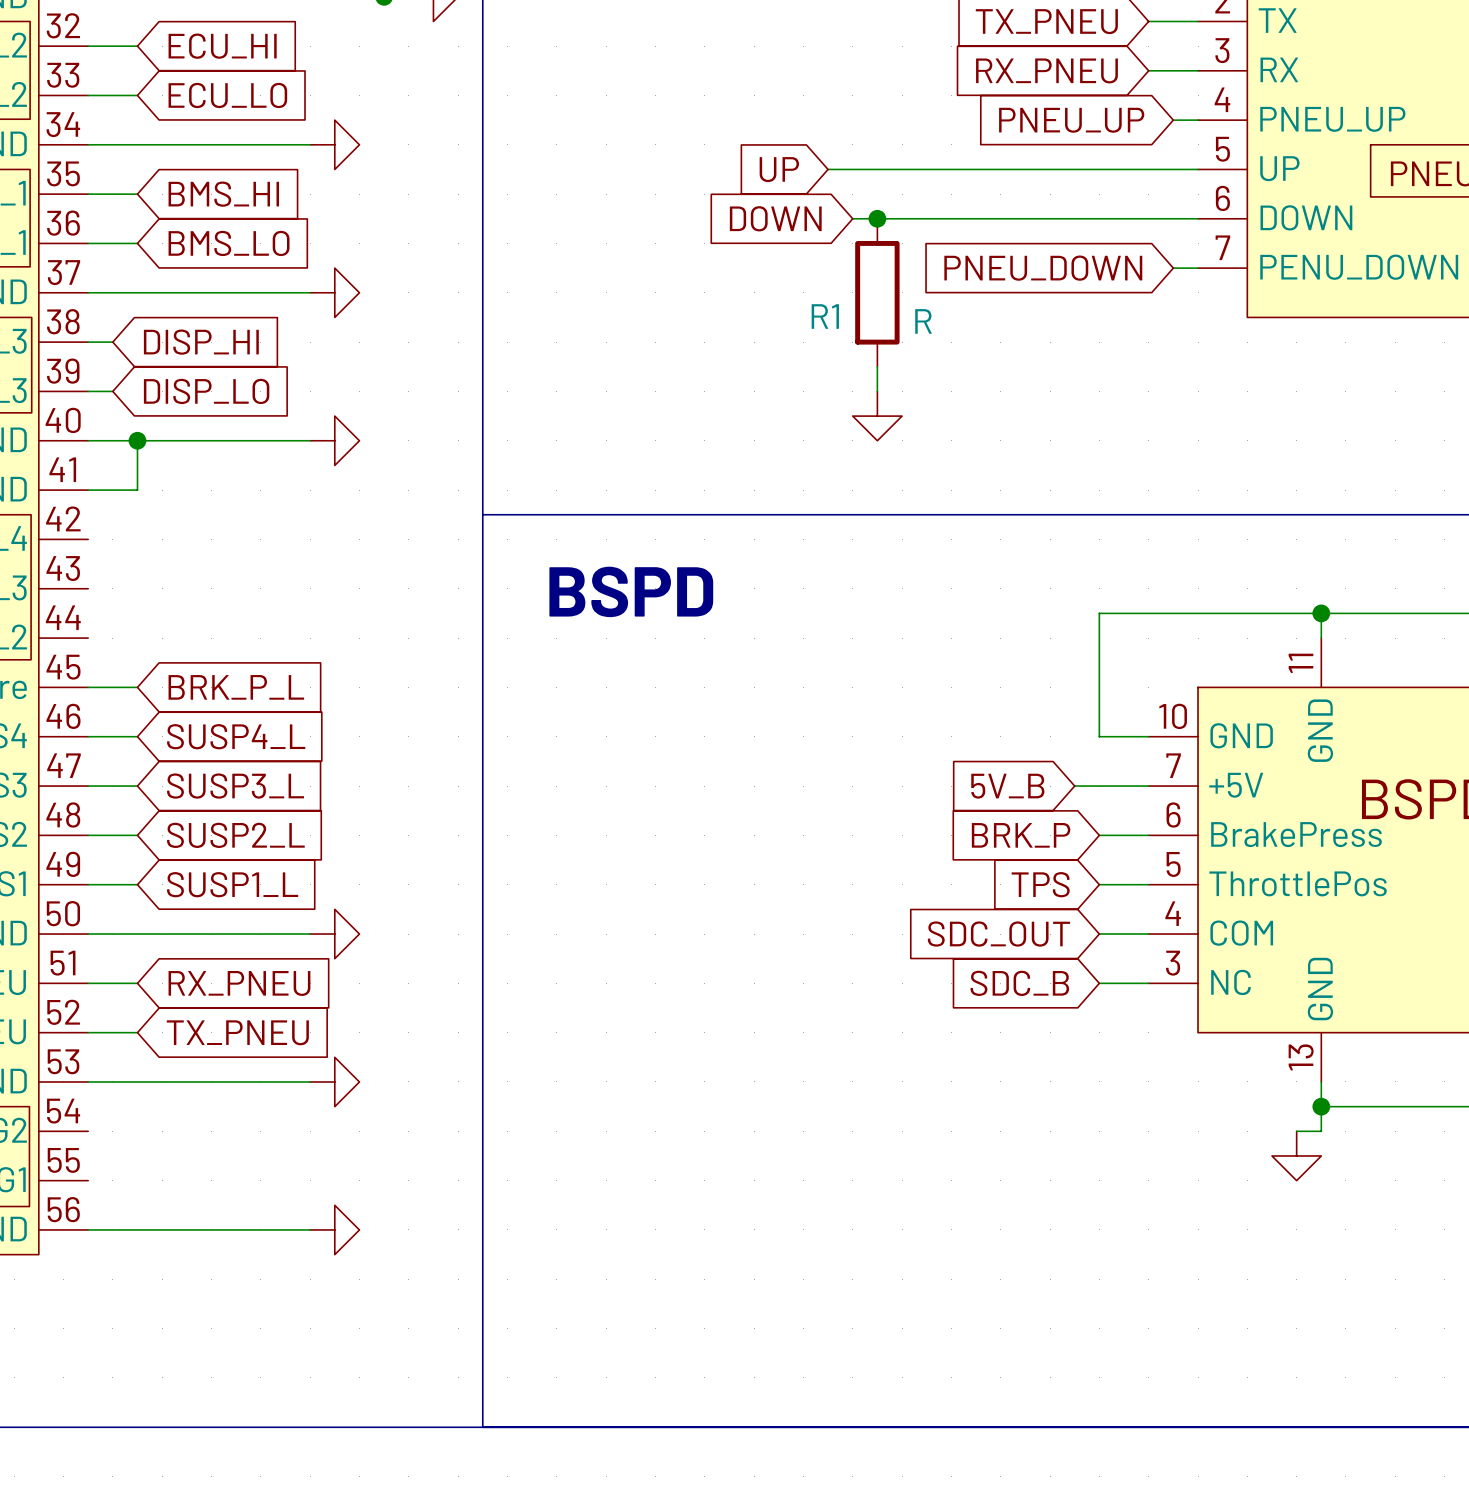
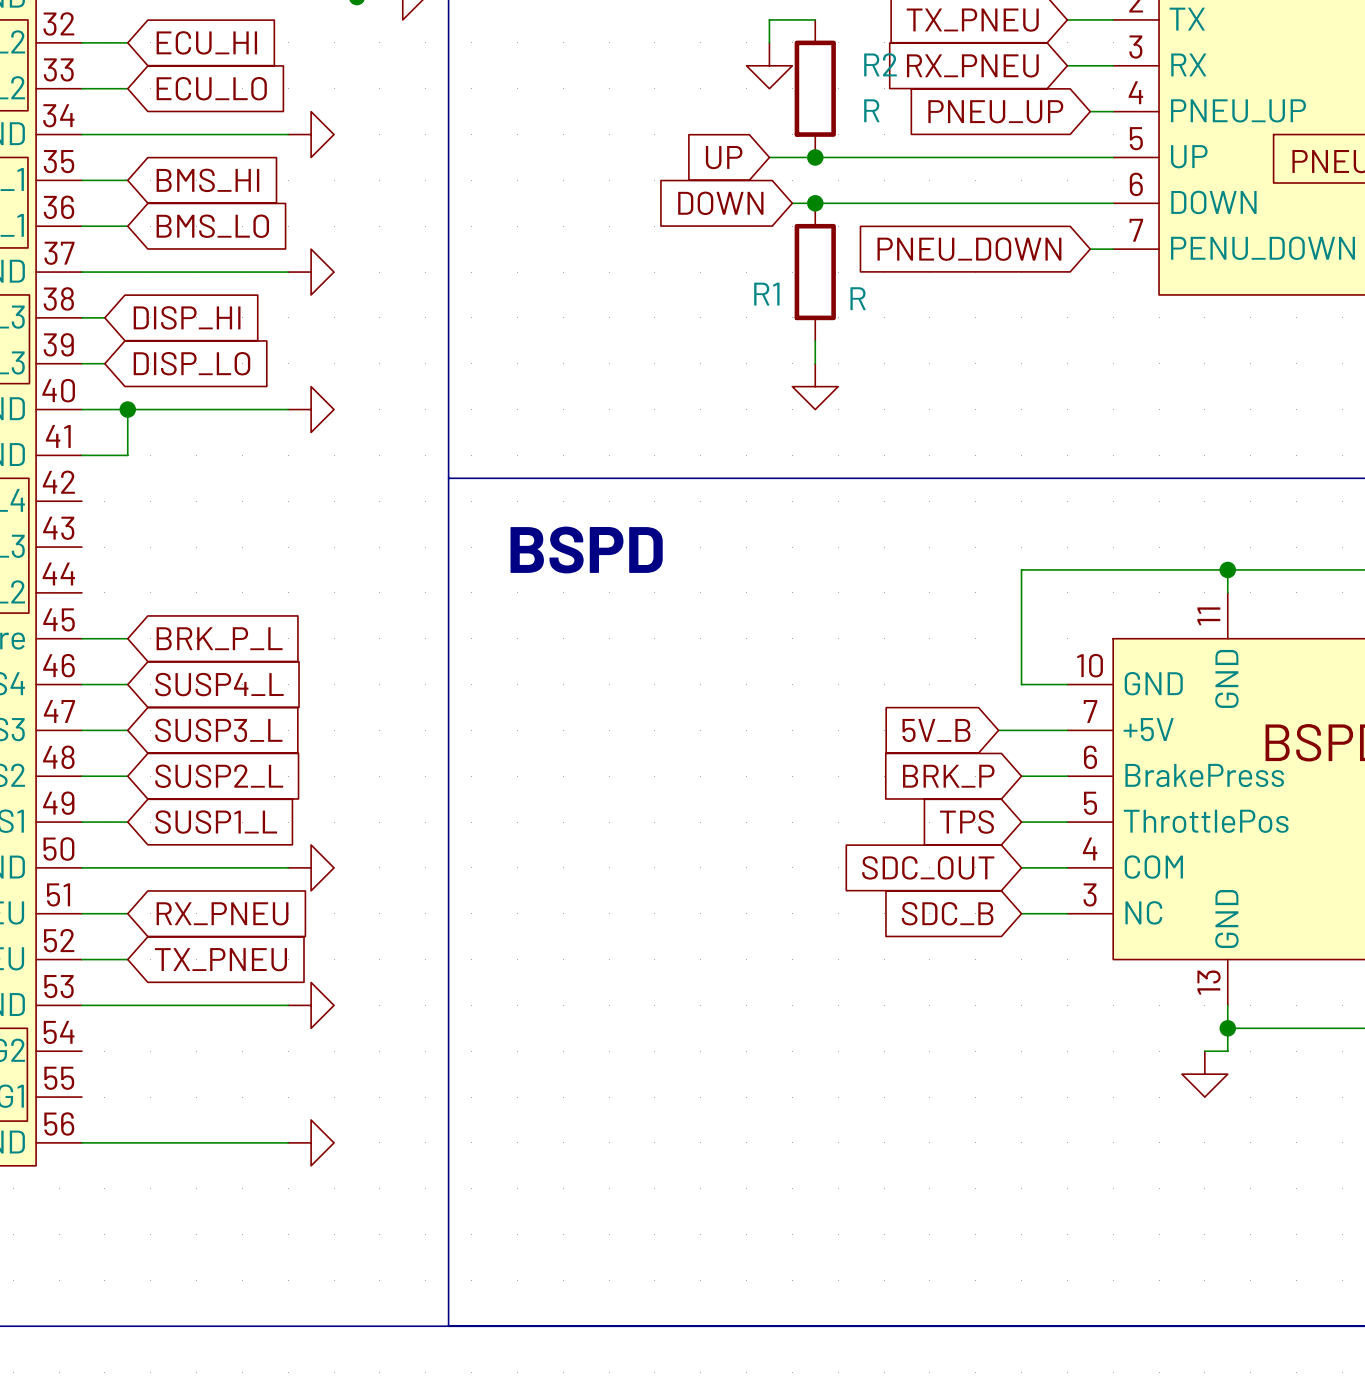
wire: none -> (815, 19) (769, 19) (769, 42)
power symbol: none -> (769, 65)
R2: none -> R (815, 88)
junction: none -> (815, 157)

